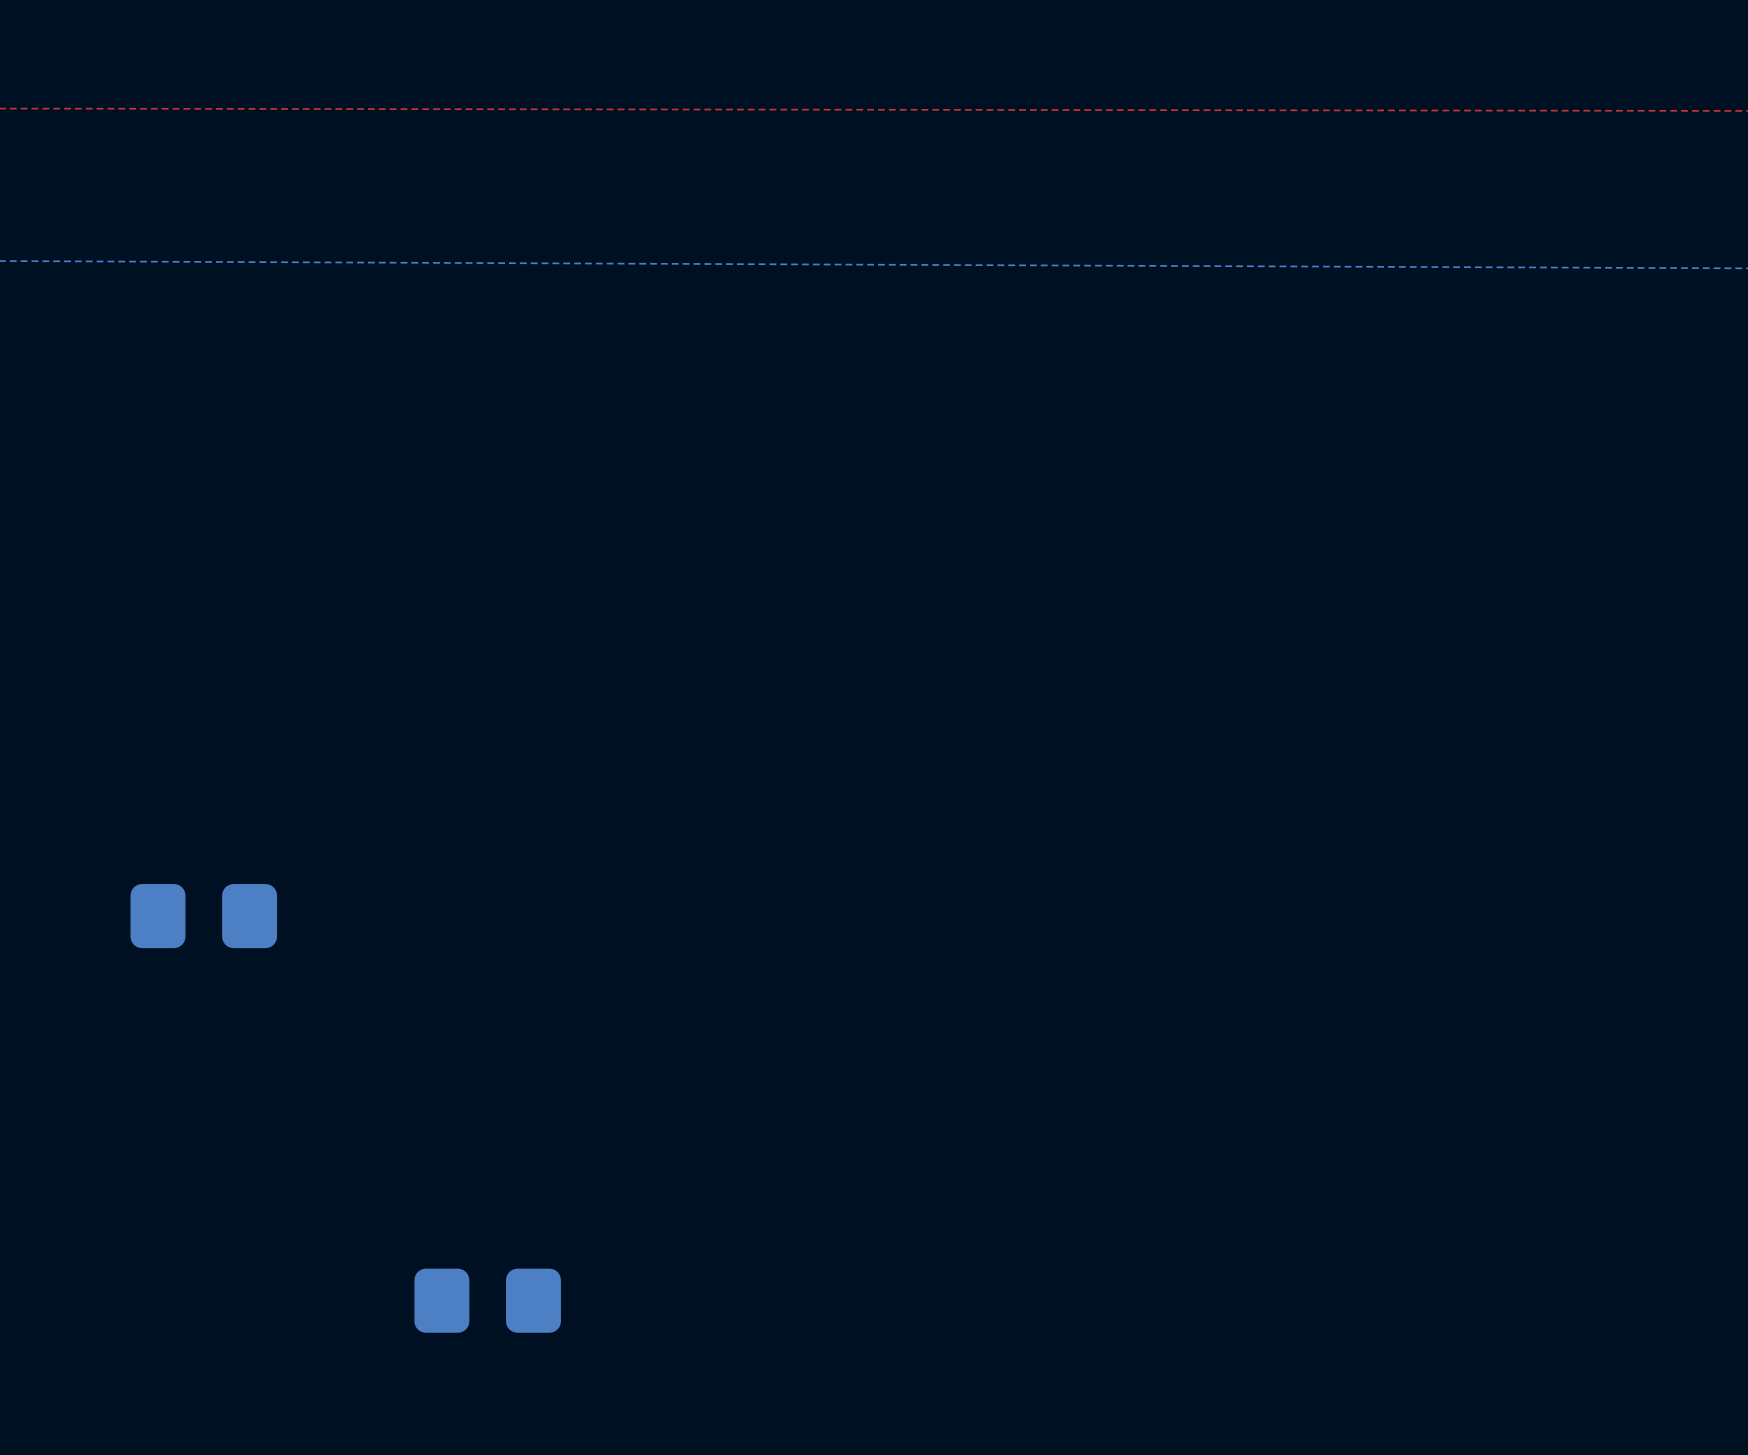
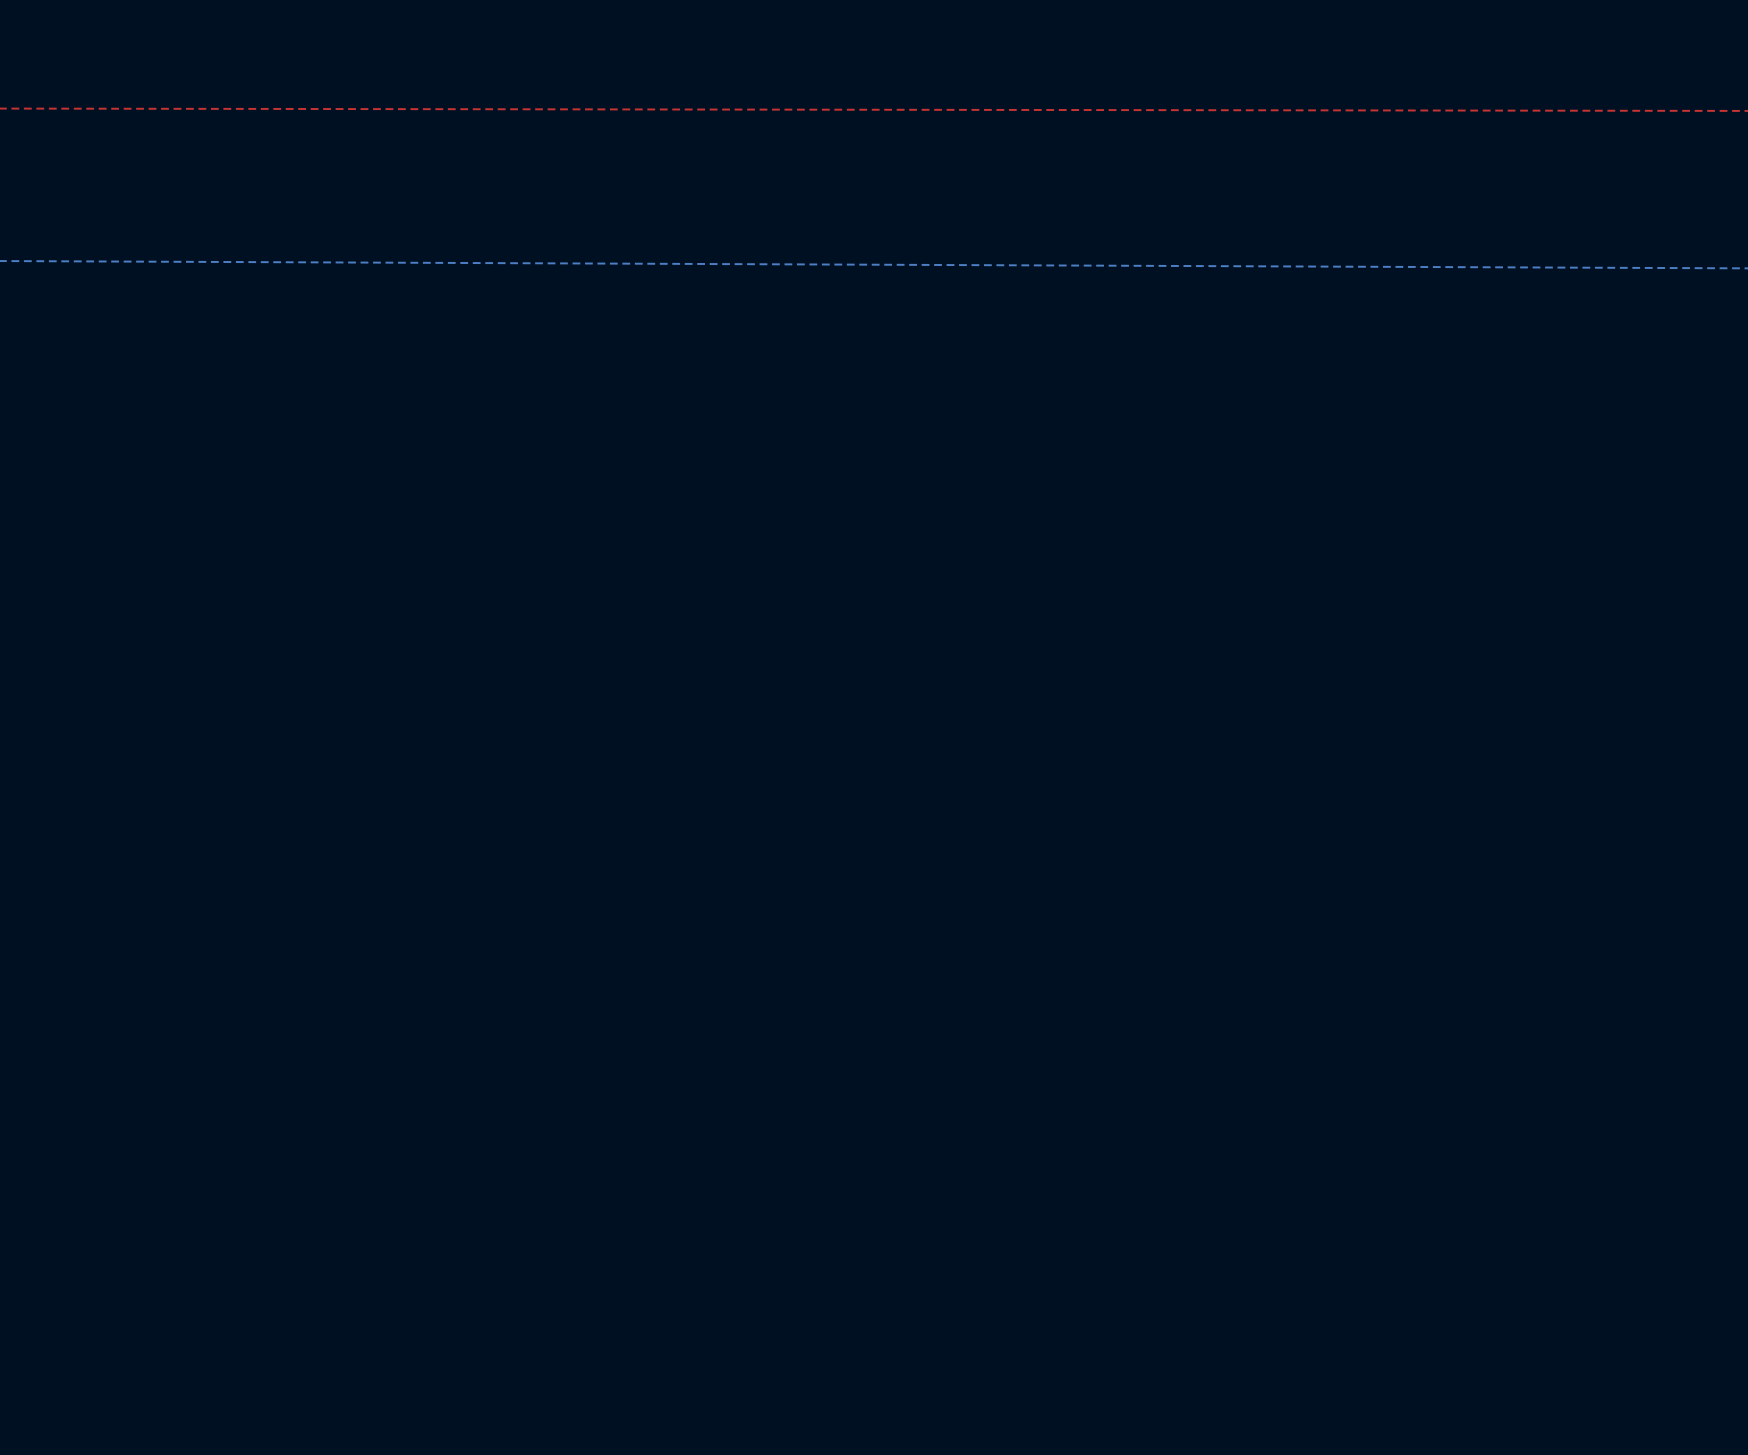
part: (203, 916) -> none
part: (487, 1300) -> none

